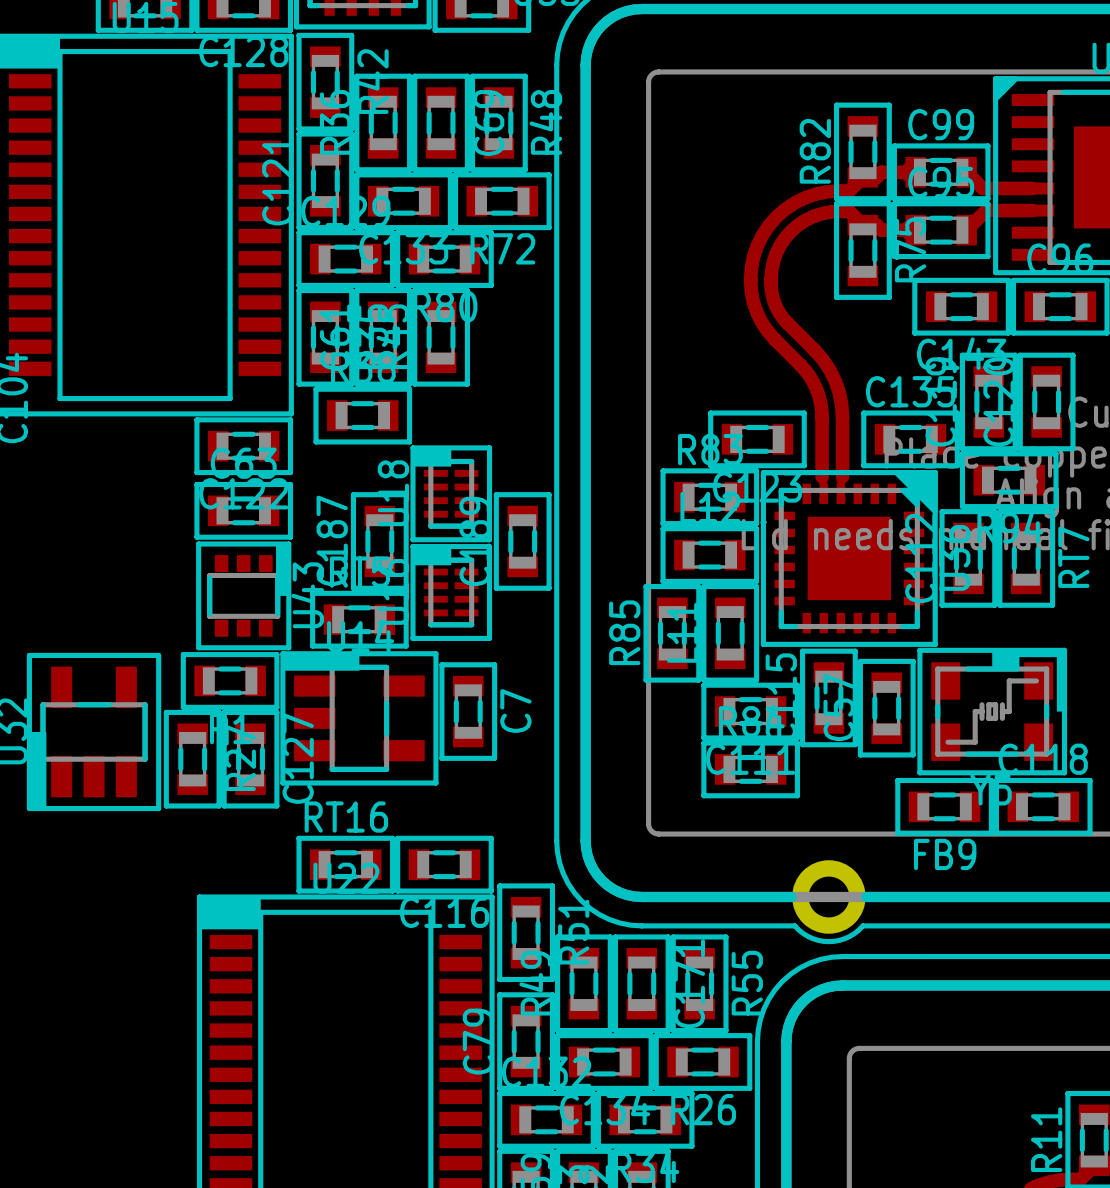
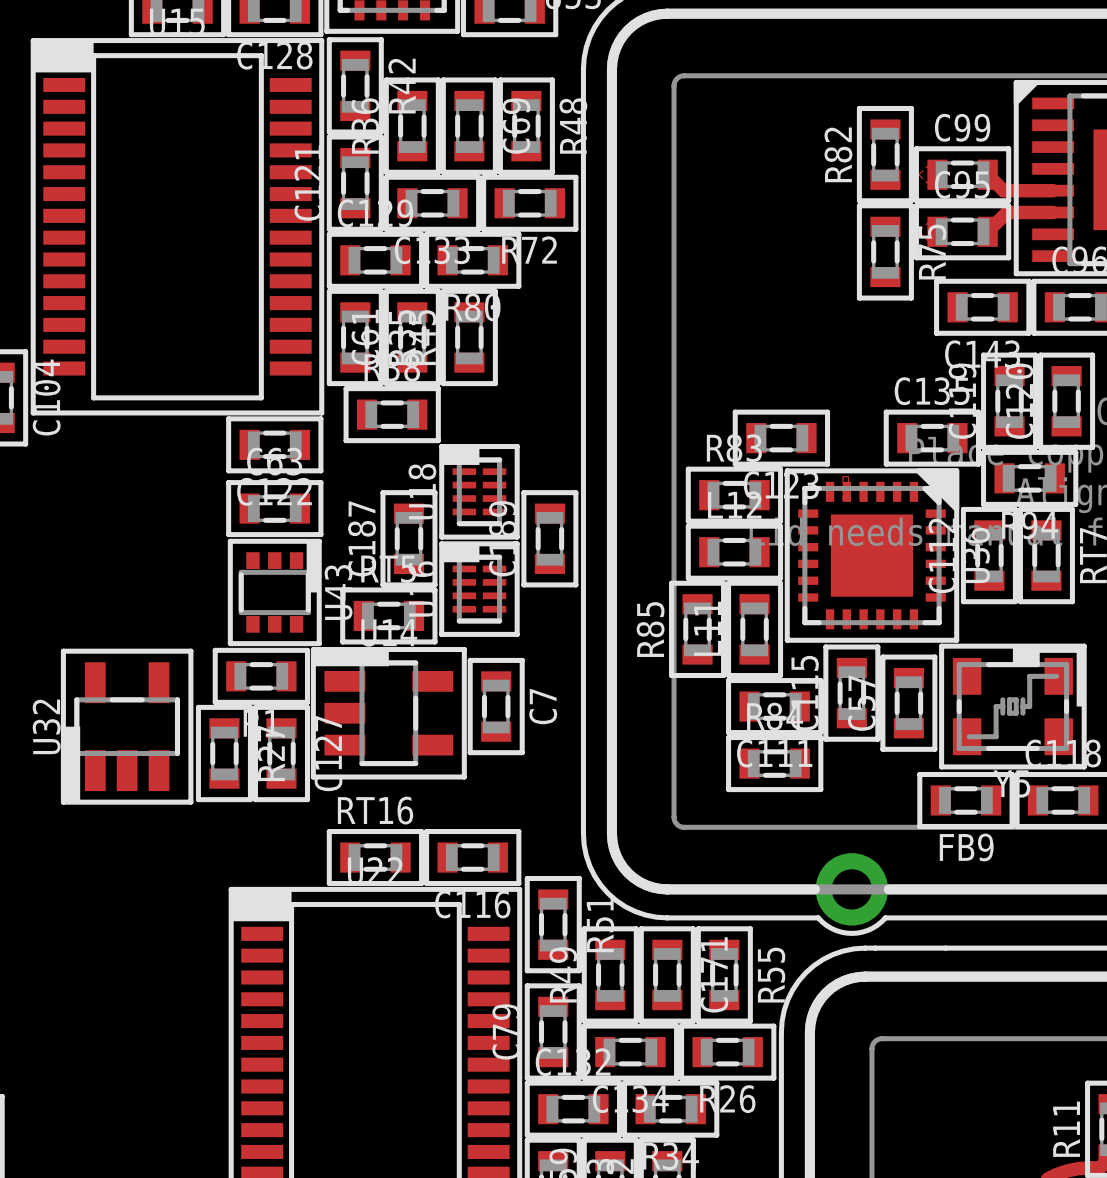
top track: (915, 172) (881, 172) (876, 177) (862, 177) (849, 191) (816, 194) (794, 202) (776, 216) (768, 225) (762, 235) (753, 256) (750, 280) (756, 312) (767, 331) (805, 370) (818, 395) (821, 410) (823, 493) -> none
top track: (915, 230) (881, 230) (876, 225) (862, 225) (849, 211) (821, 213) (805, 220) (791, 231) (780, 245) (773, 261) (771, 289) (777, 309) (787, 323) (823, 359) (829, 370) (839, 392) (842, 417) (840, 493) -> none

